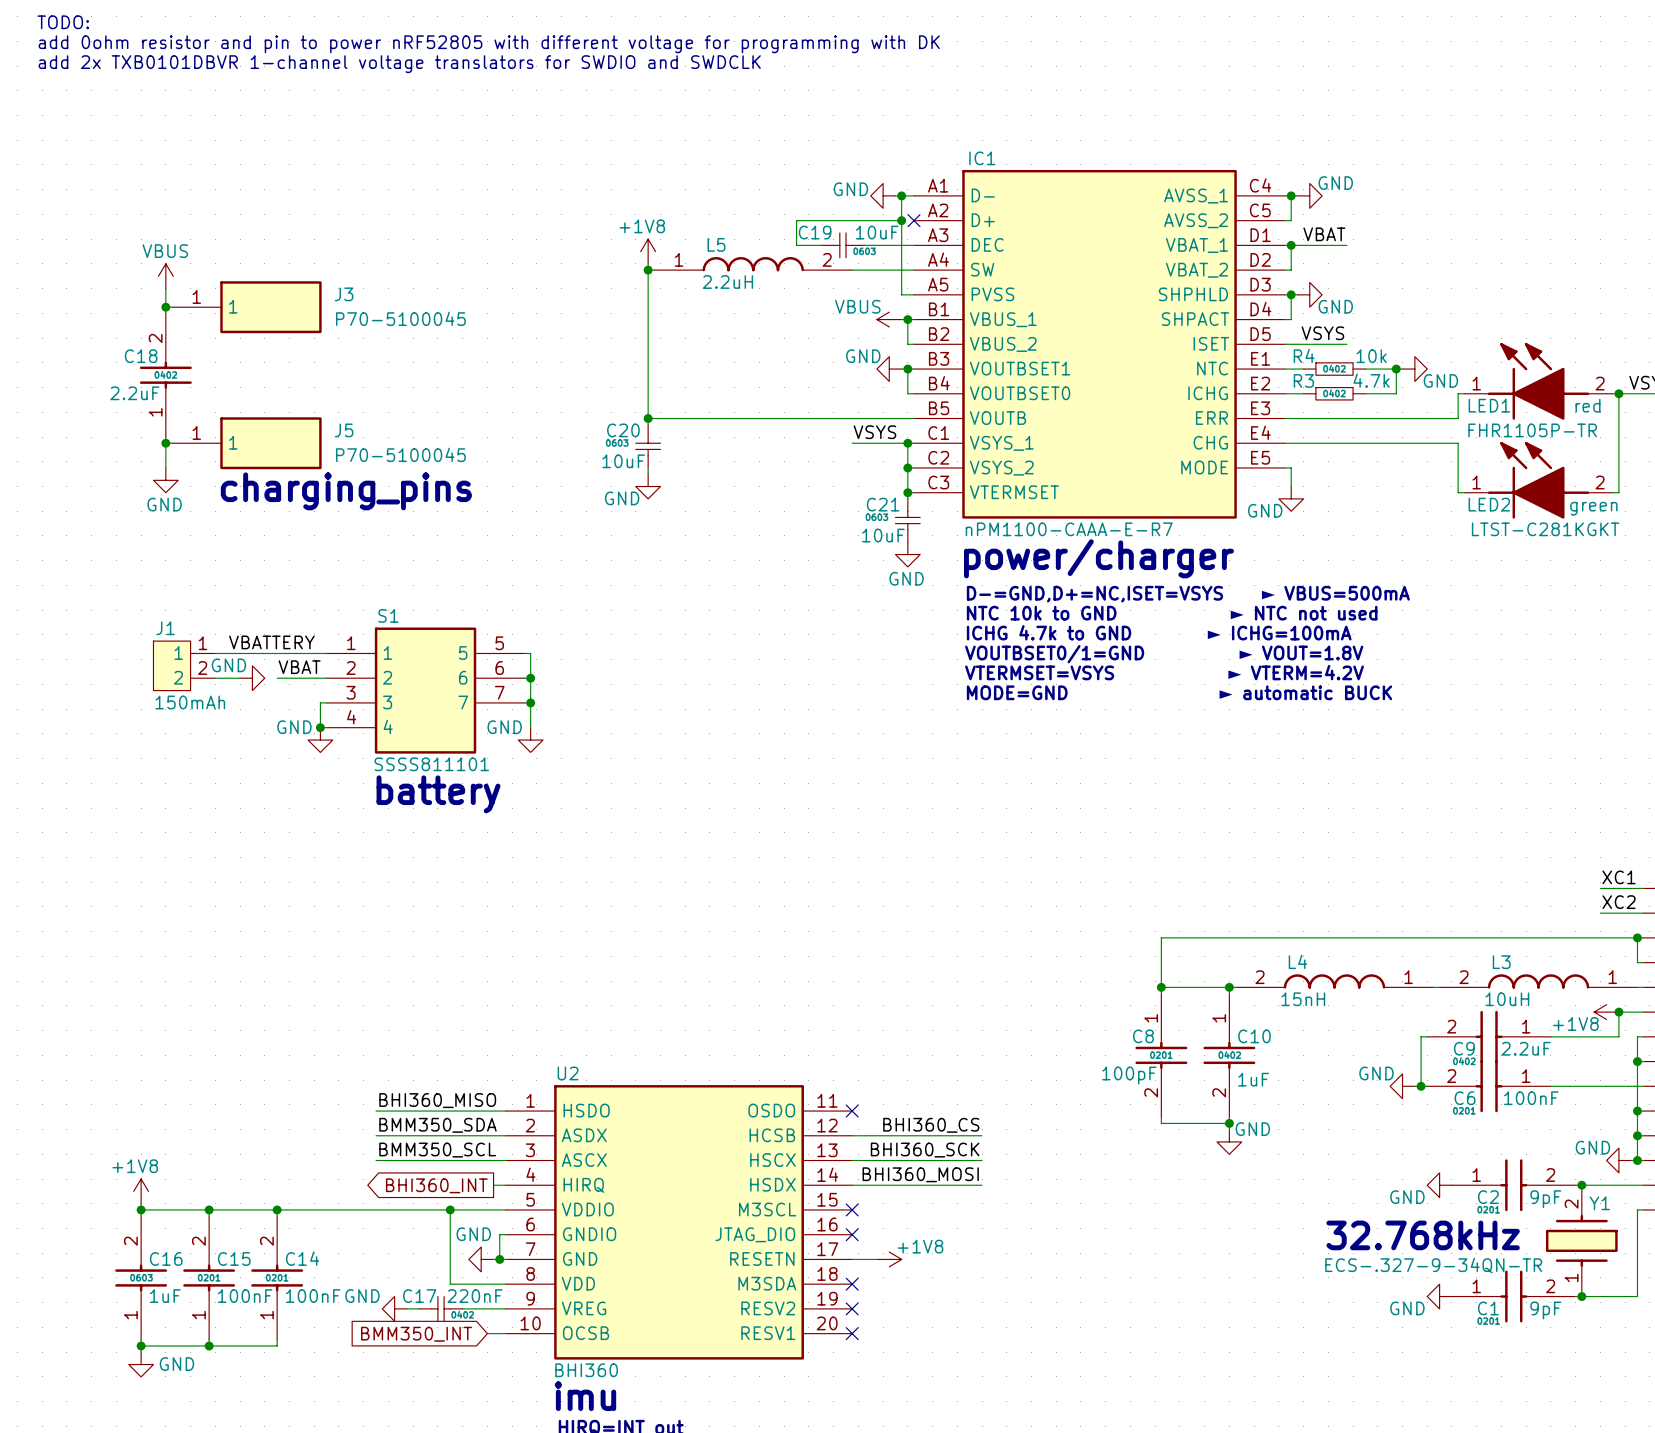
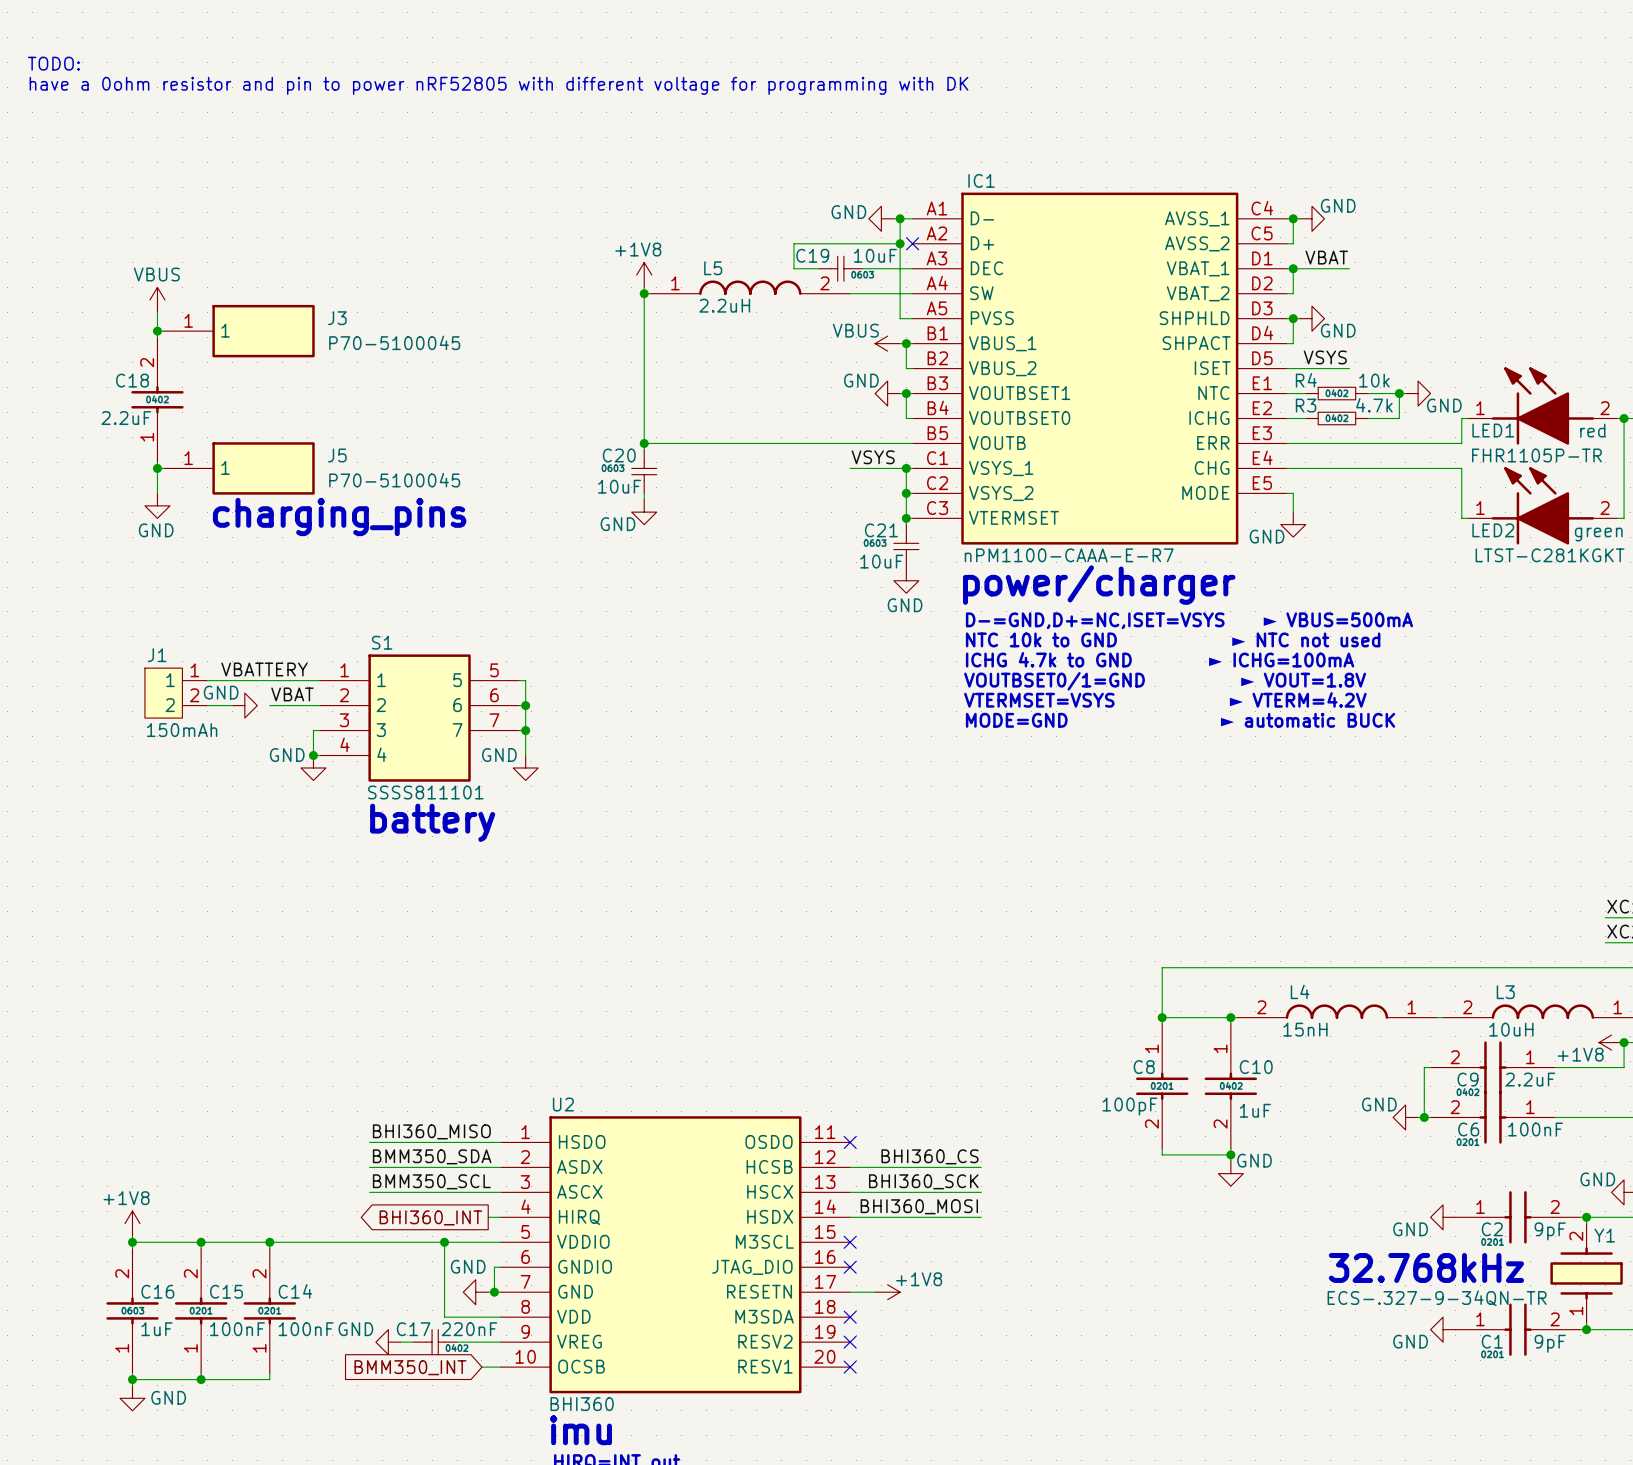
text: TODO: (63, 22) -> none
text: add 0ohm resistor and pin to power nRF52805 with different voltage for programming with DK (489, 44) -> TODO: (53, 63)
text: add 2x TXB0101DBVR 1-channel voltage translators for SWDIO and SWDCLK (399, 64) -> have a 0ohm resistor and pin to power nRF52805 with different voltage for programming with DK (499, 85)

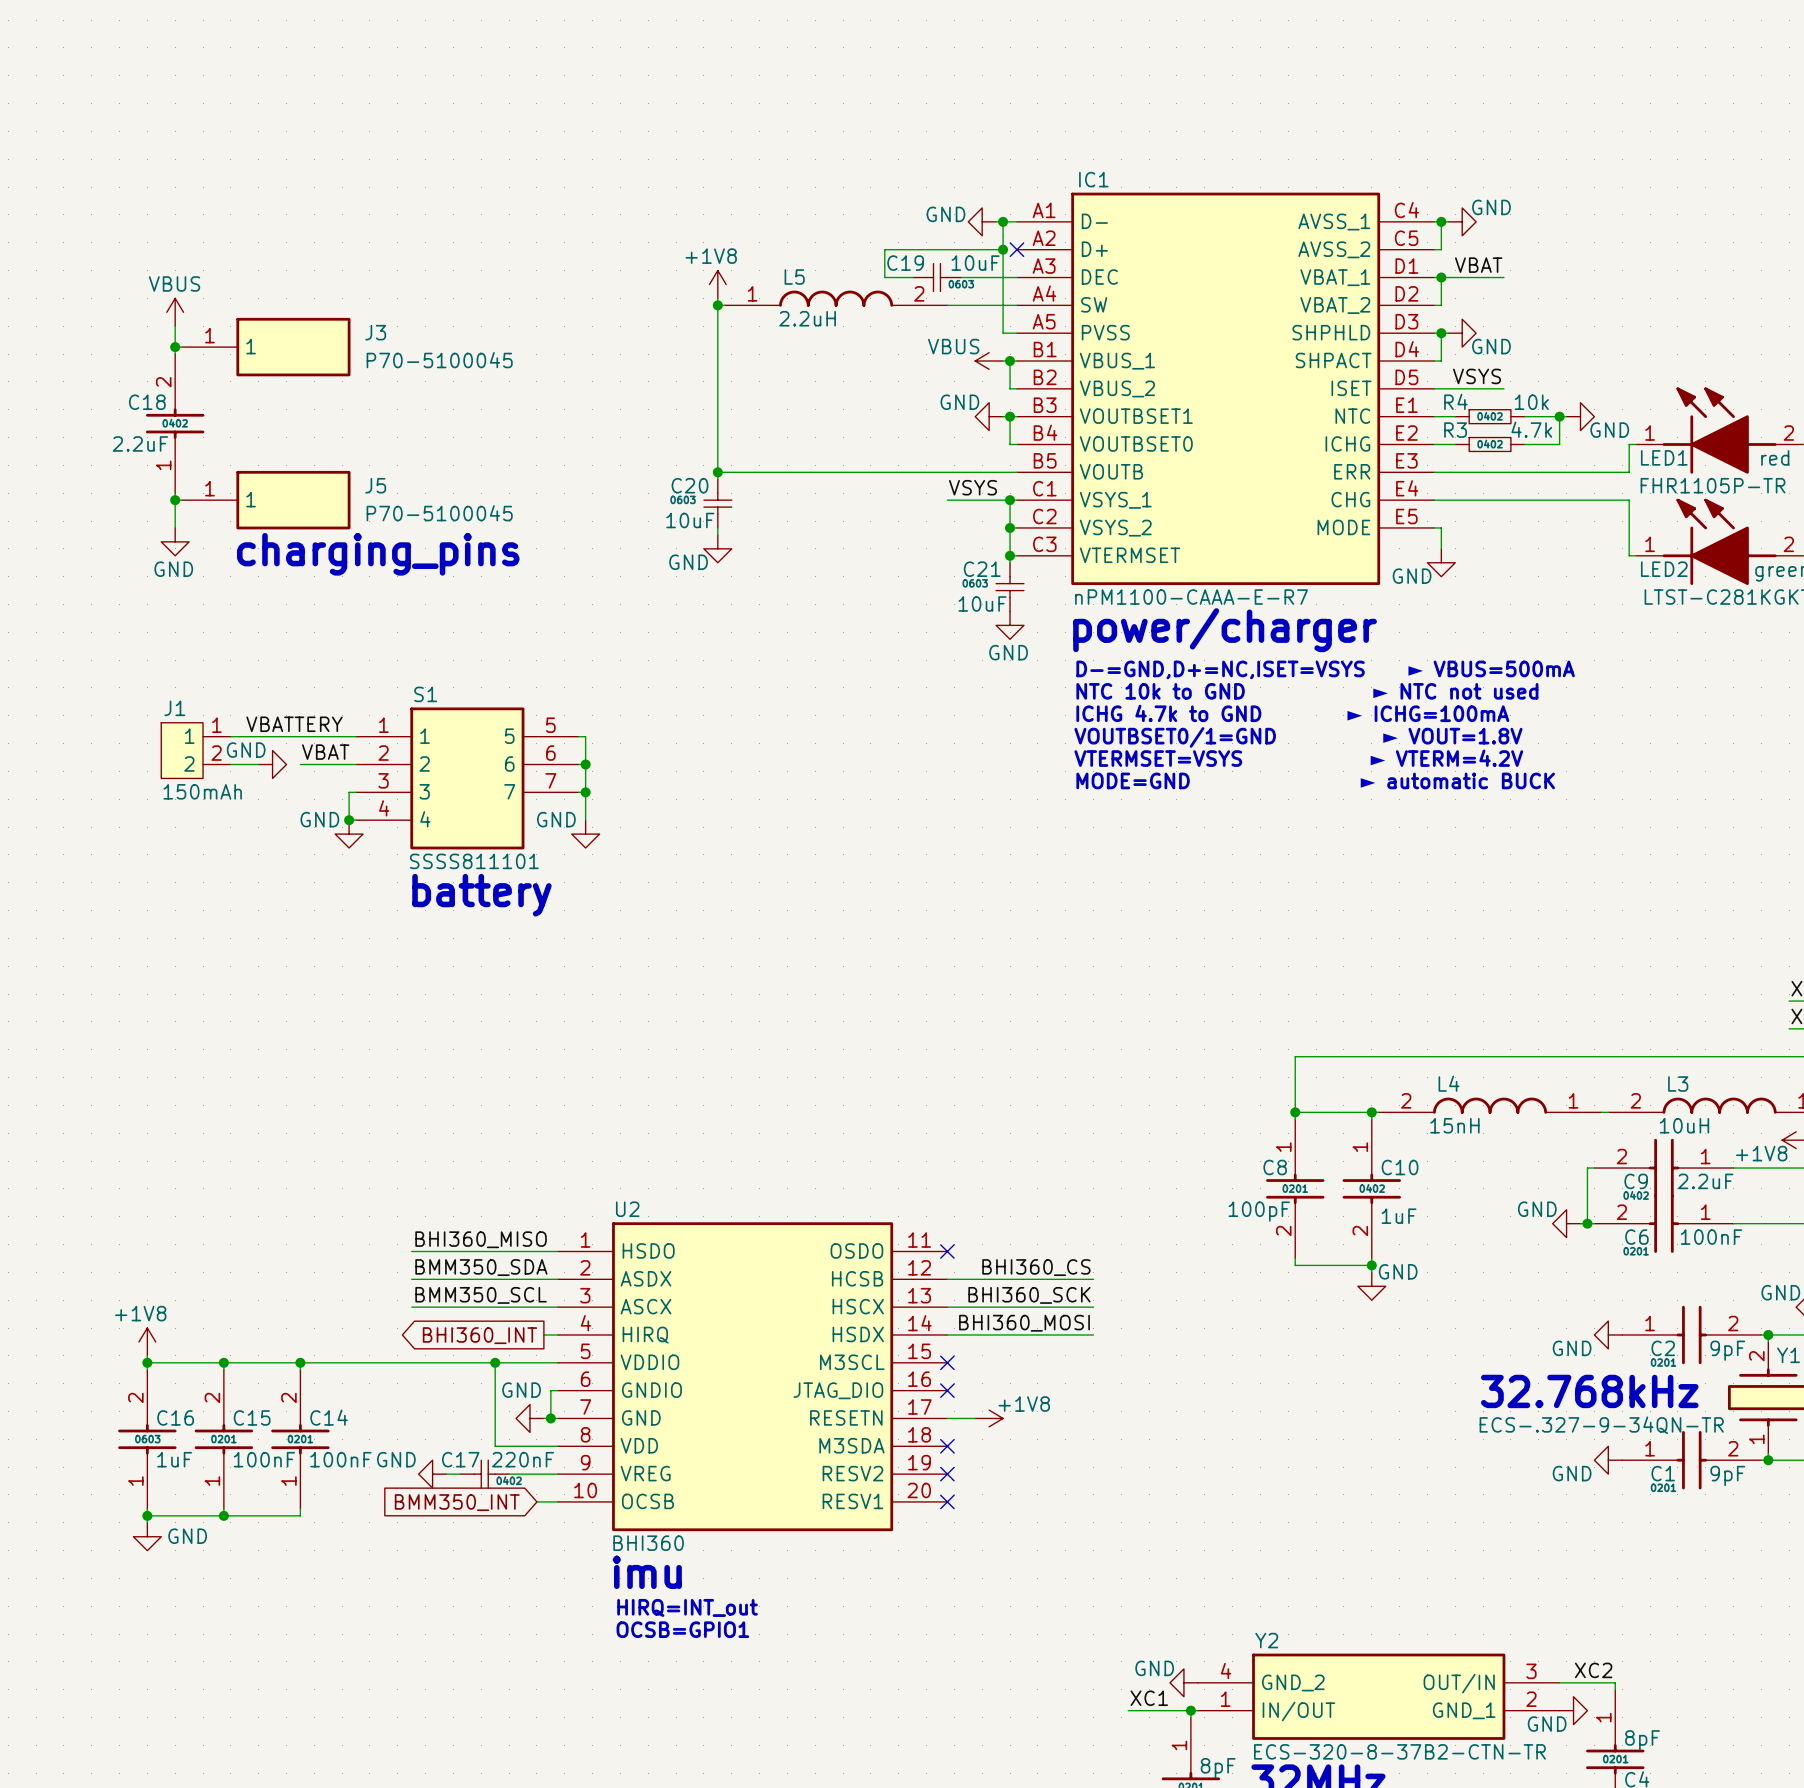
text: TODO: (53, 63) -> none
text: have a 0ohm resistor and pin to power nRF52805 with different voltage for programming with DK (499, 85) -> none

